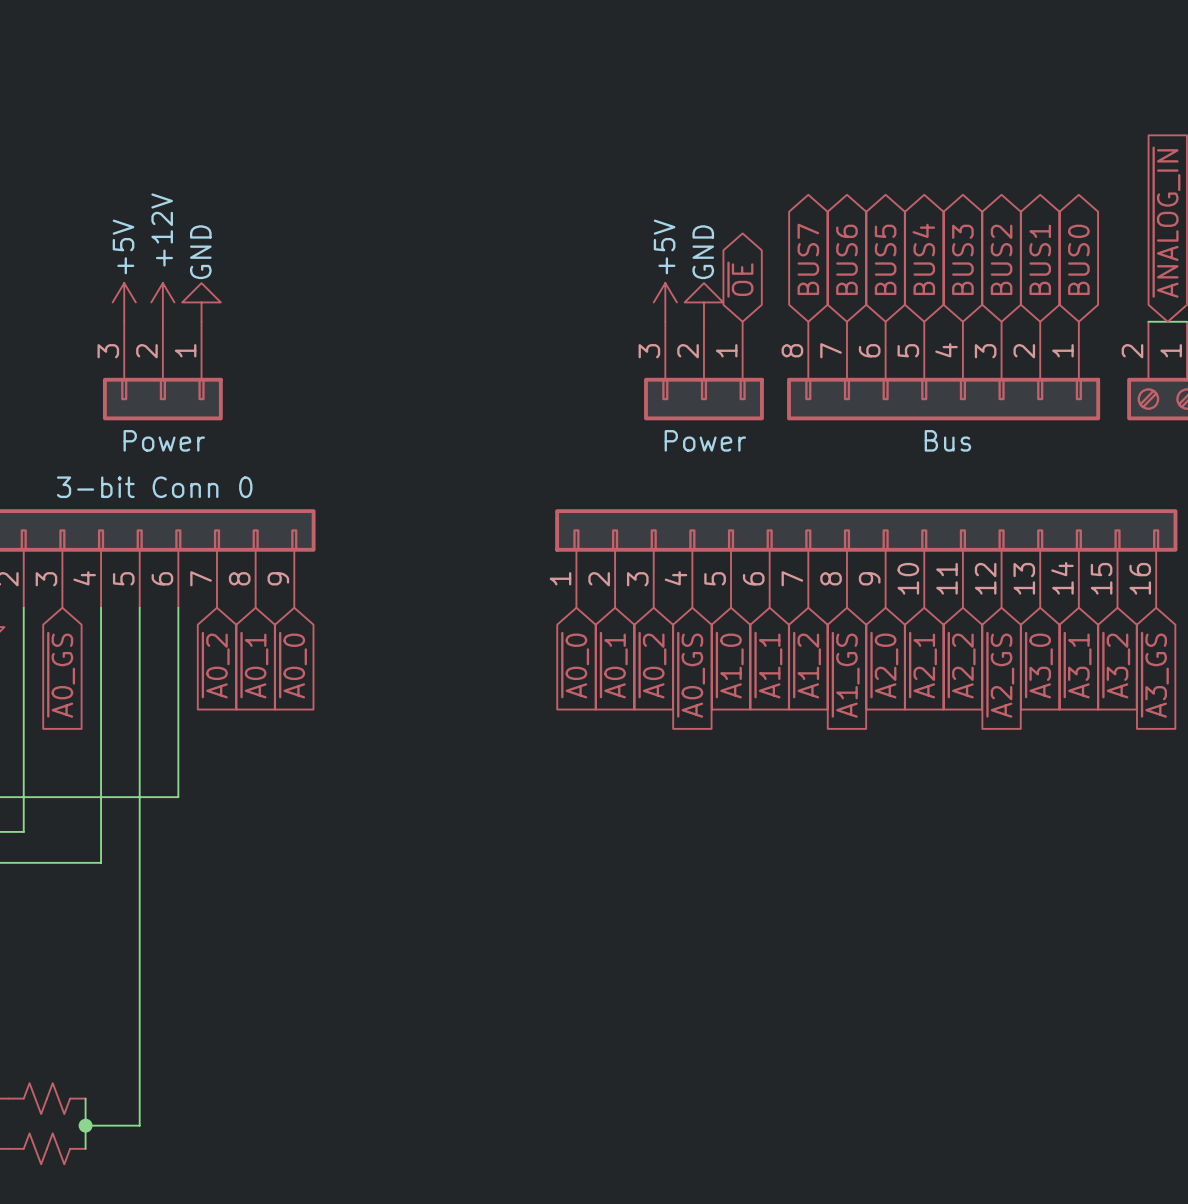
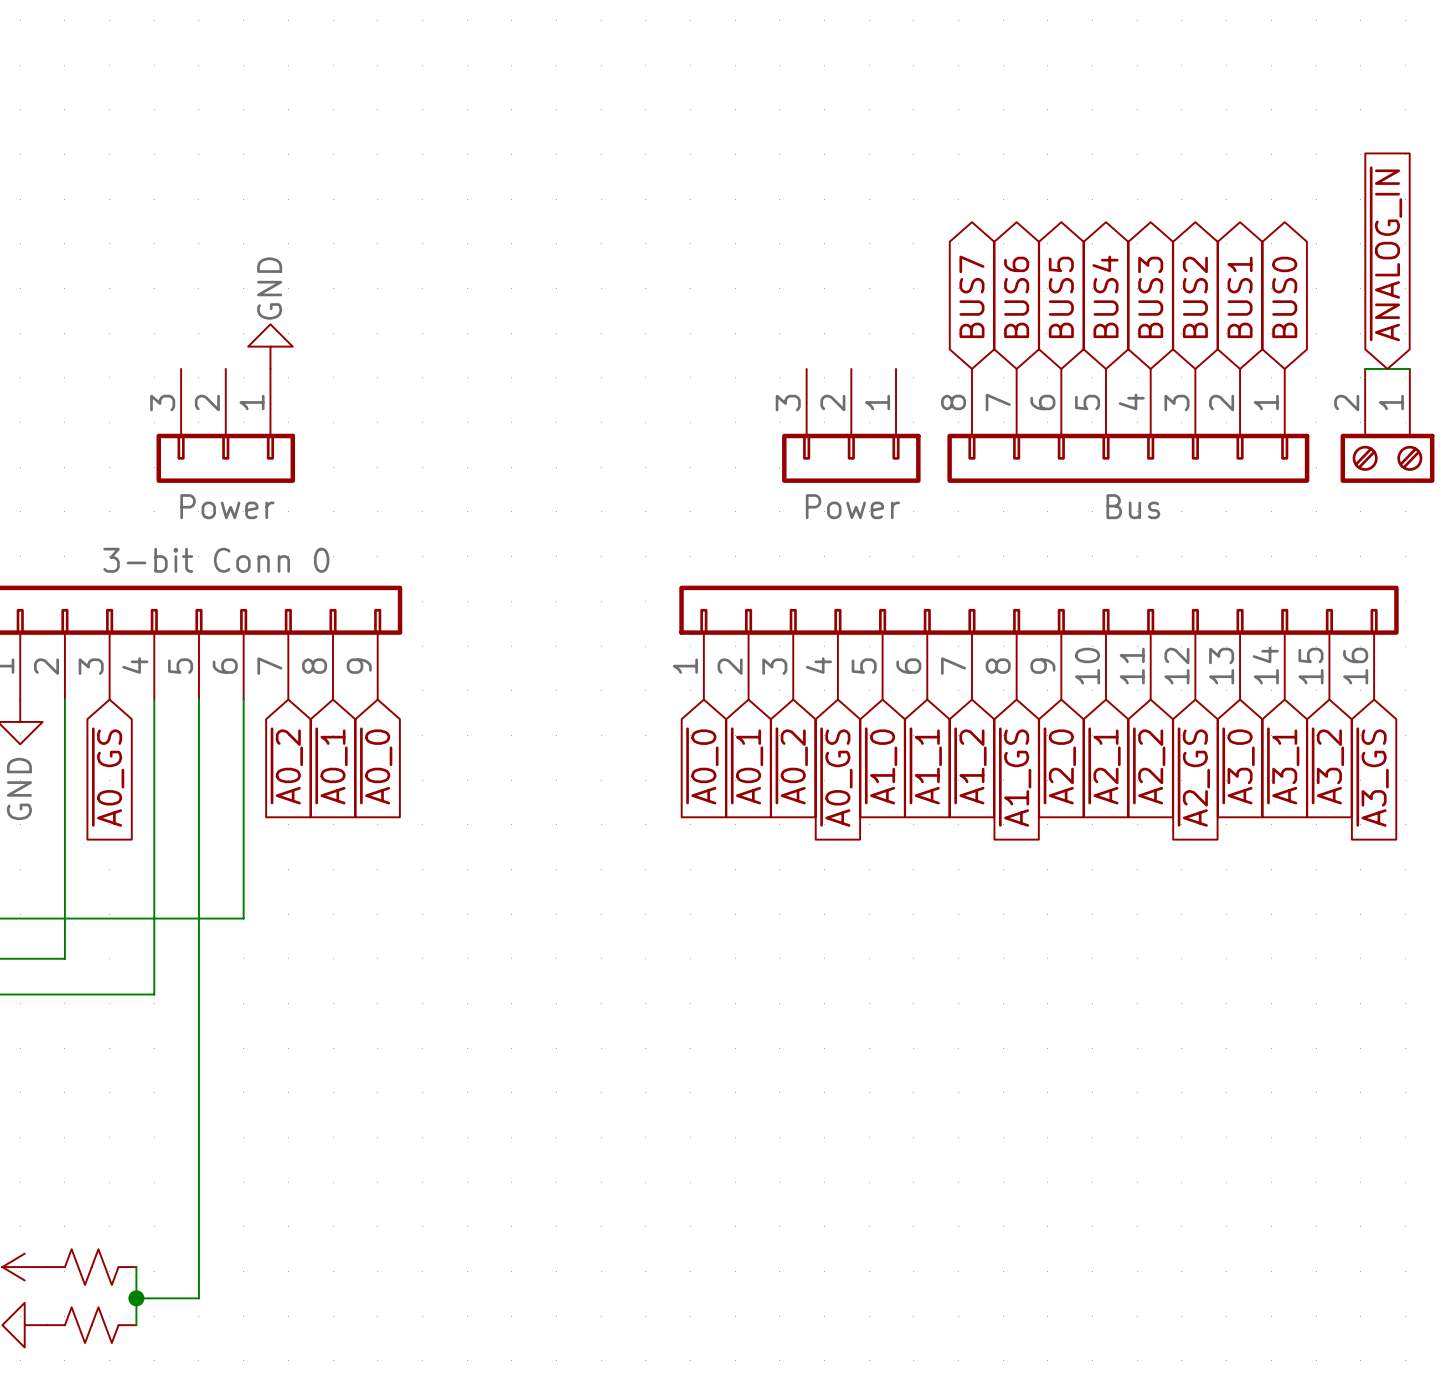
global label: ~{OE} (740, 279) -> none
power symbol: +5V (124, 302) -> none
power symbol: +12V (162, 302) -> none
power symbol: +5V (665, 302) -> none
power symbol: GND (703, 302) -> none

